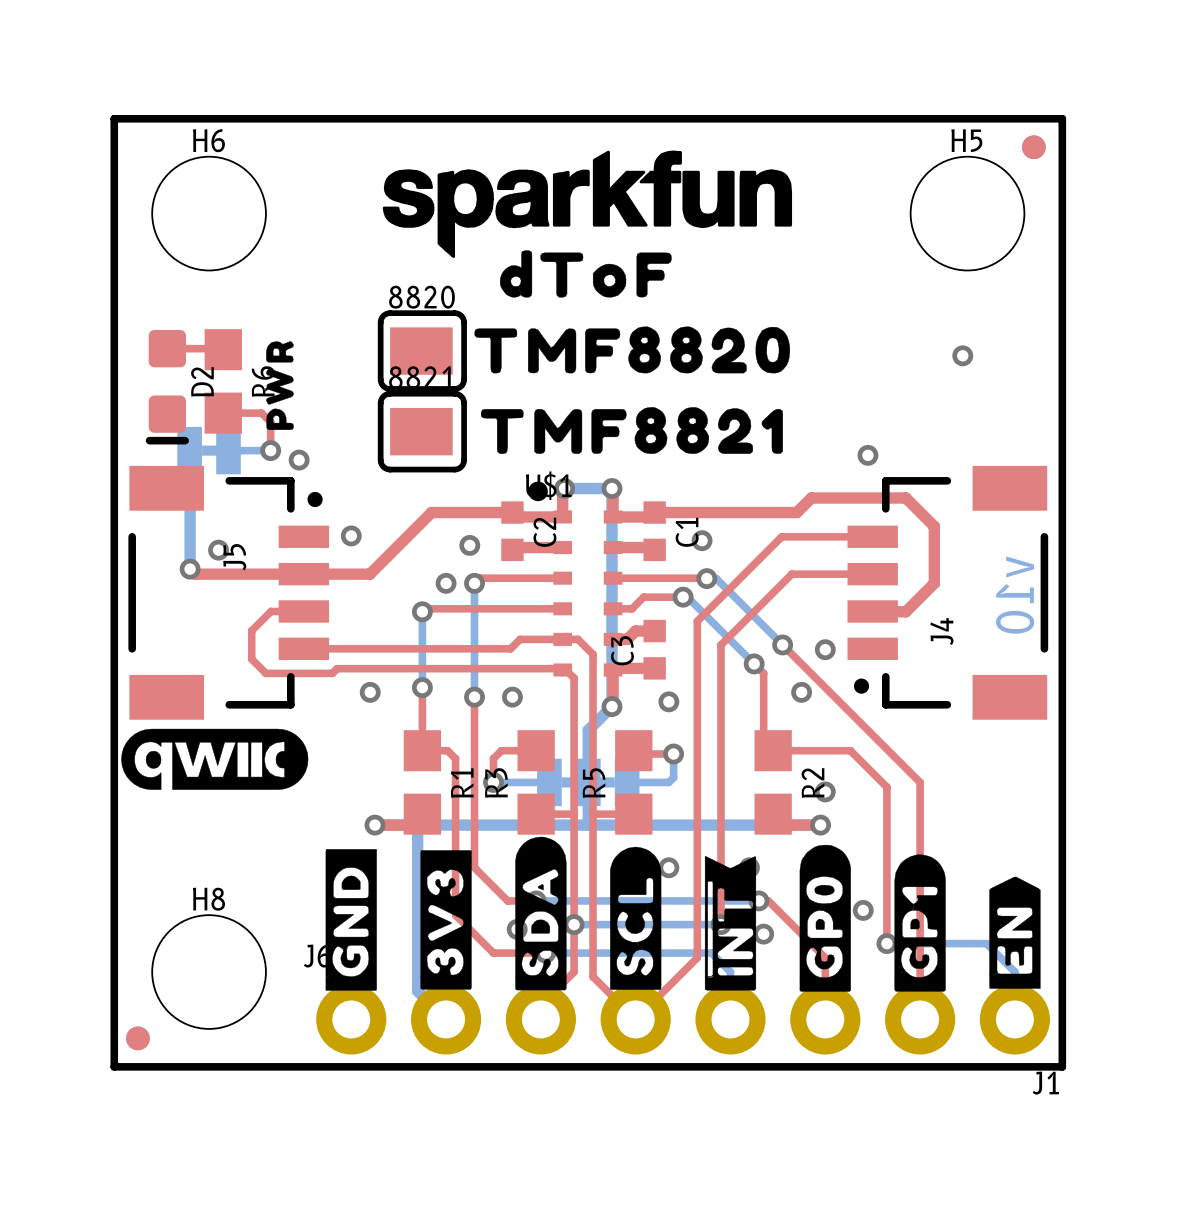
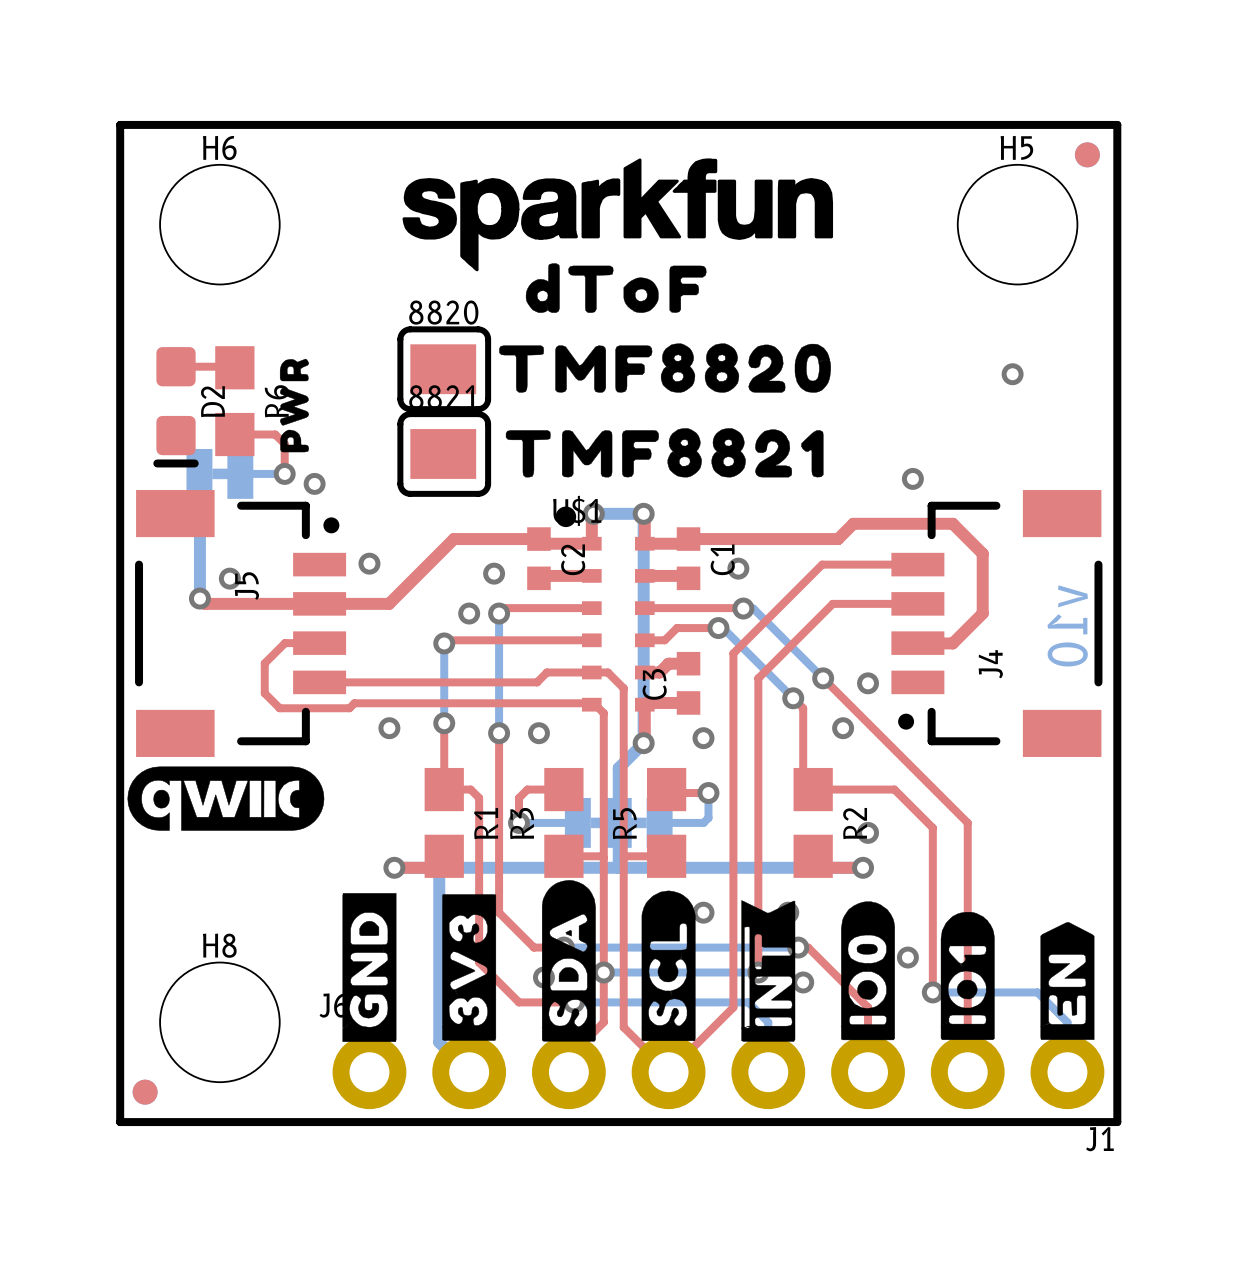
drawing shape: [799, 844, 851, 992] -> [841, 901, 895, 1041]
drawing shape: [894, 854, 946, 992] -> [940, 912, 995, 1040]

